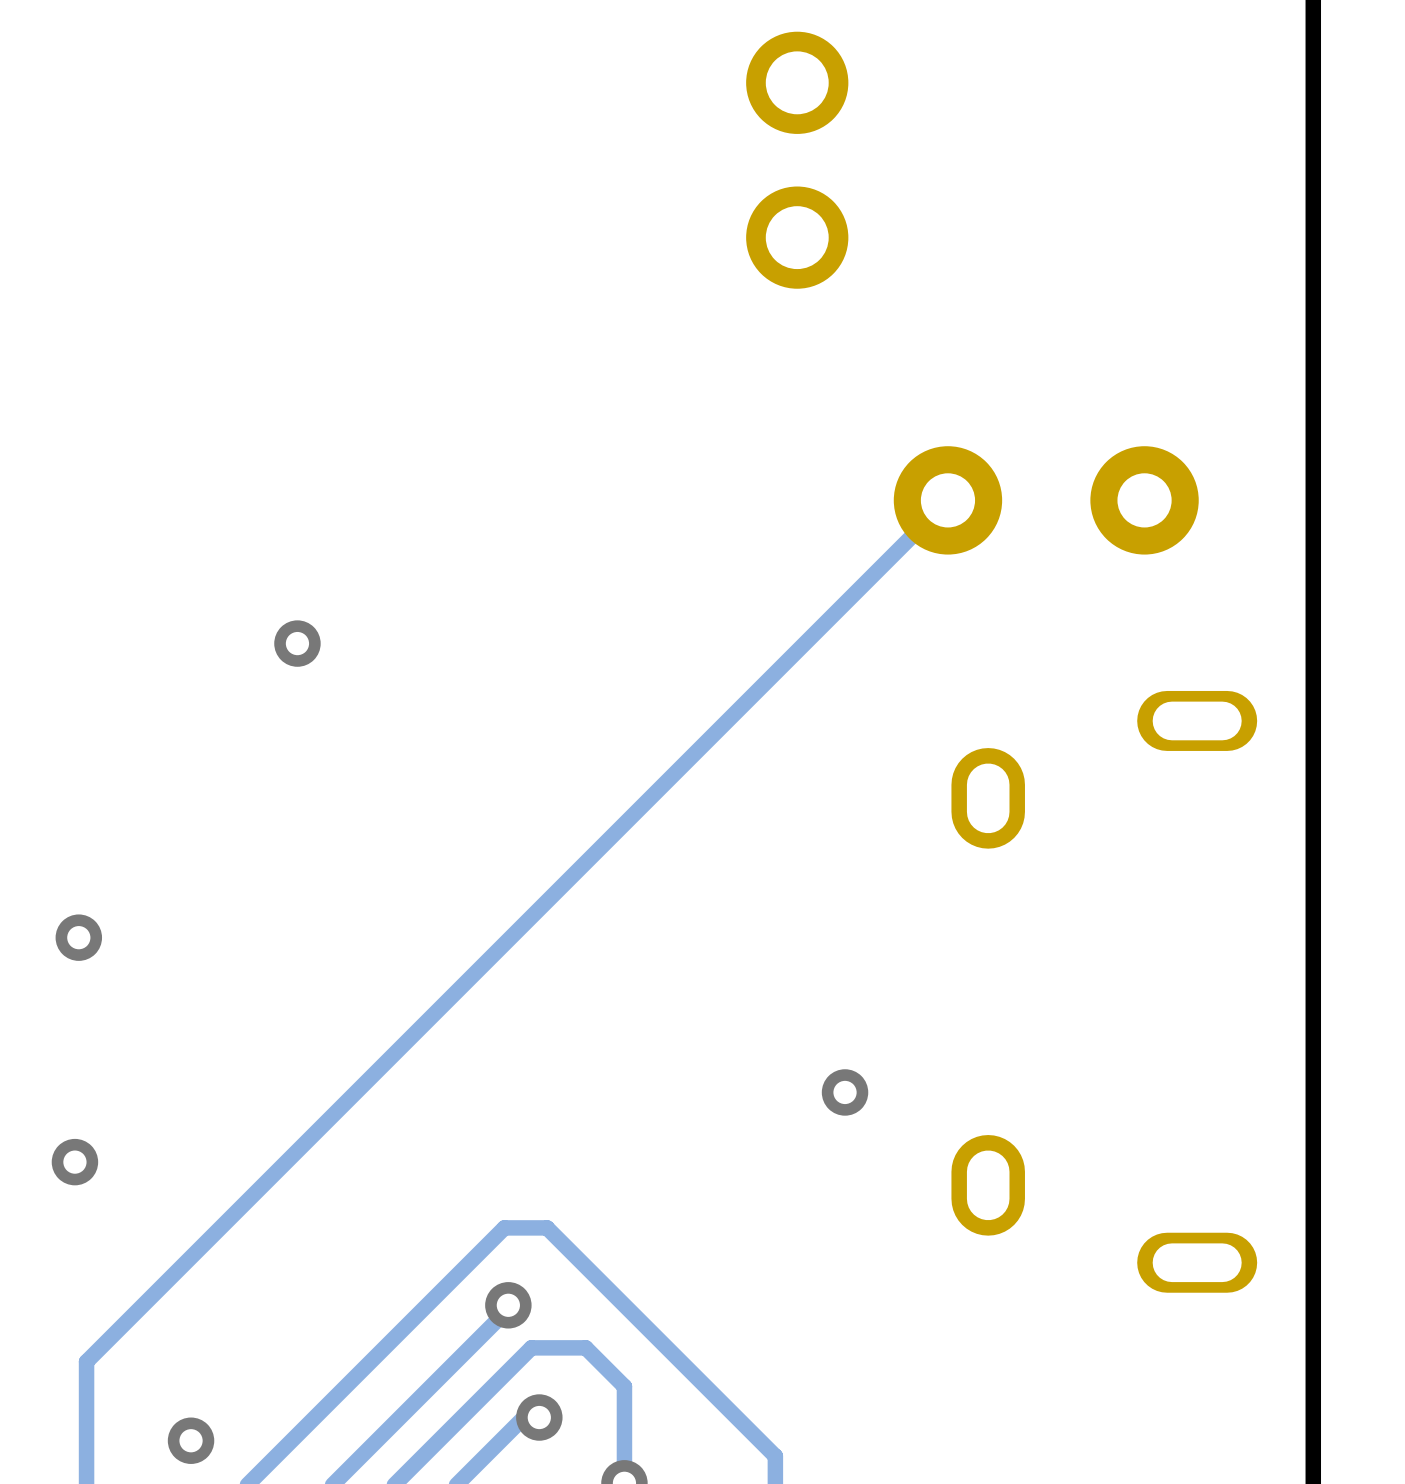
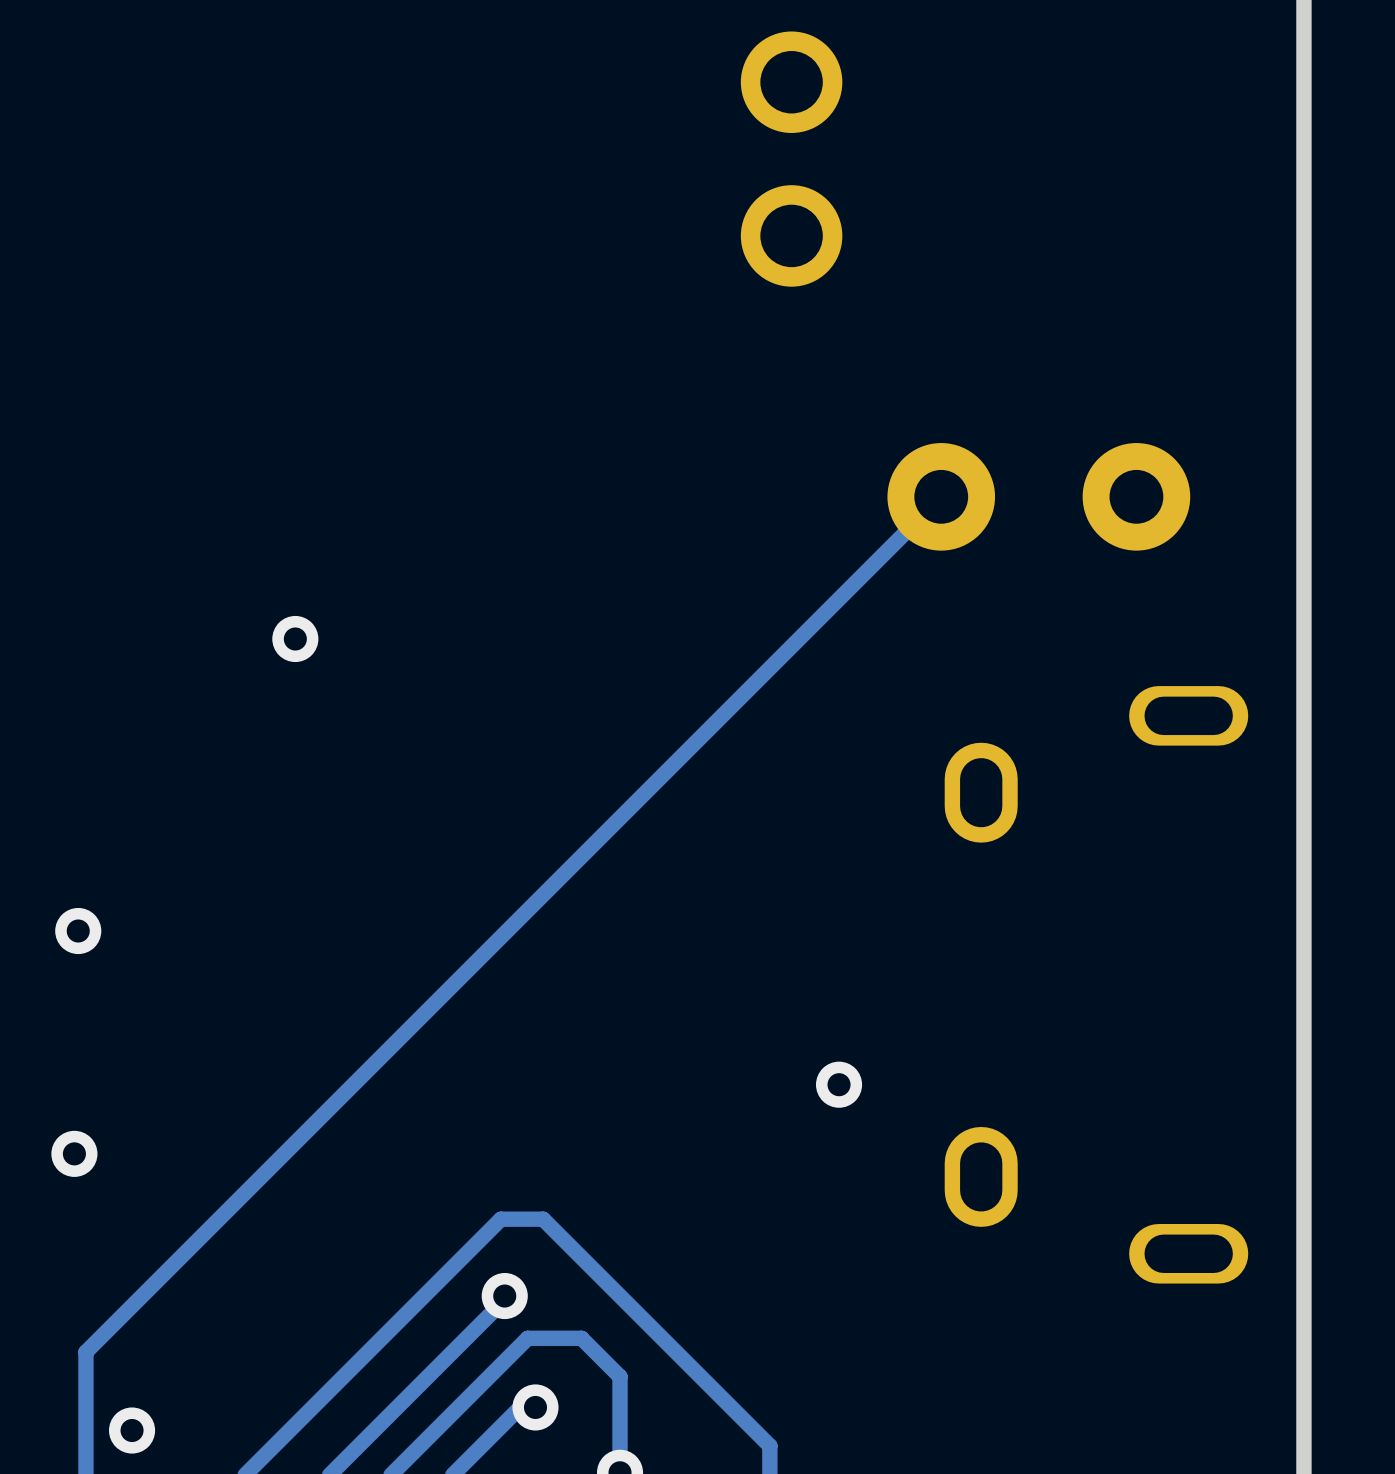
via: none -> (132, 1430)
via: (191, 1440) -> none

